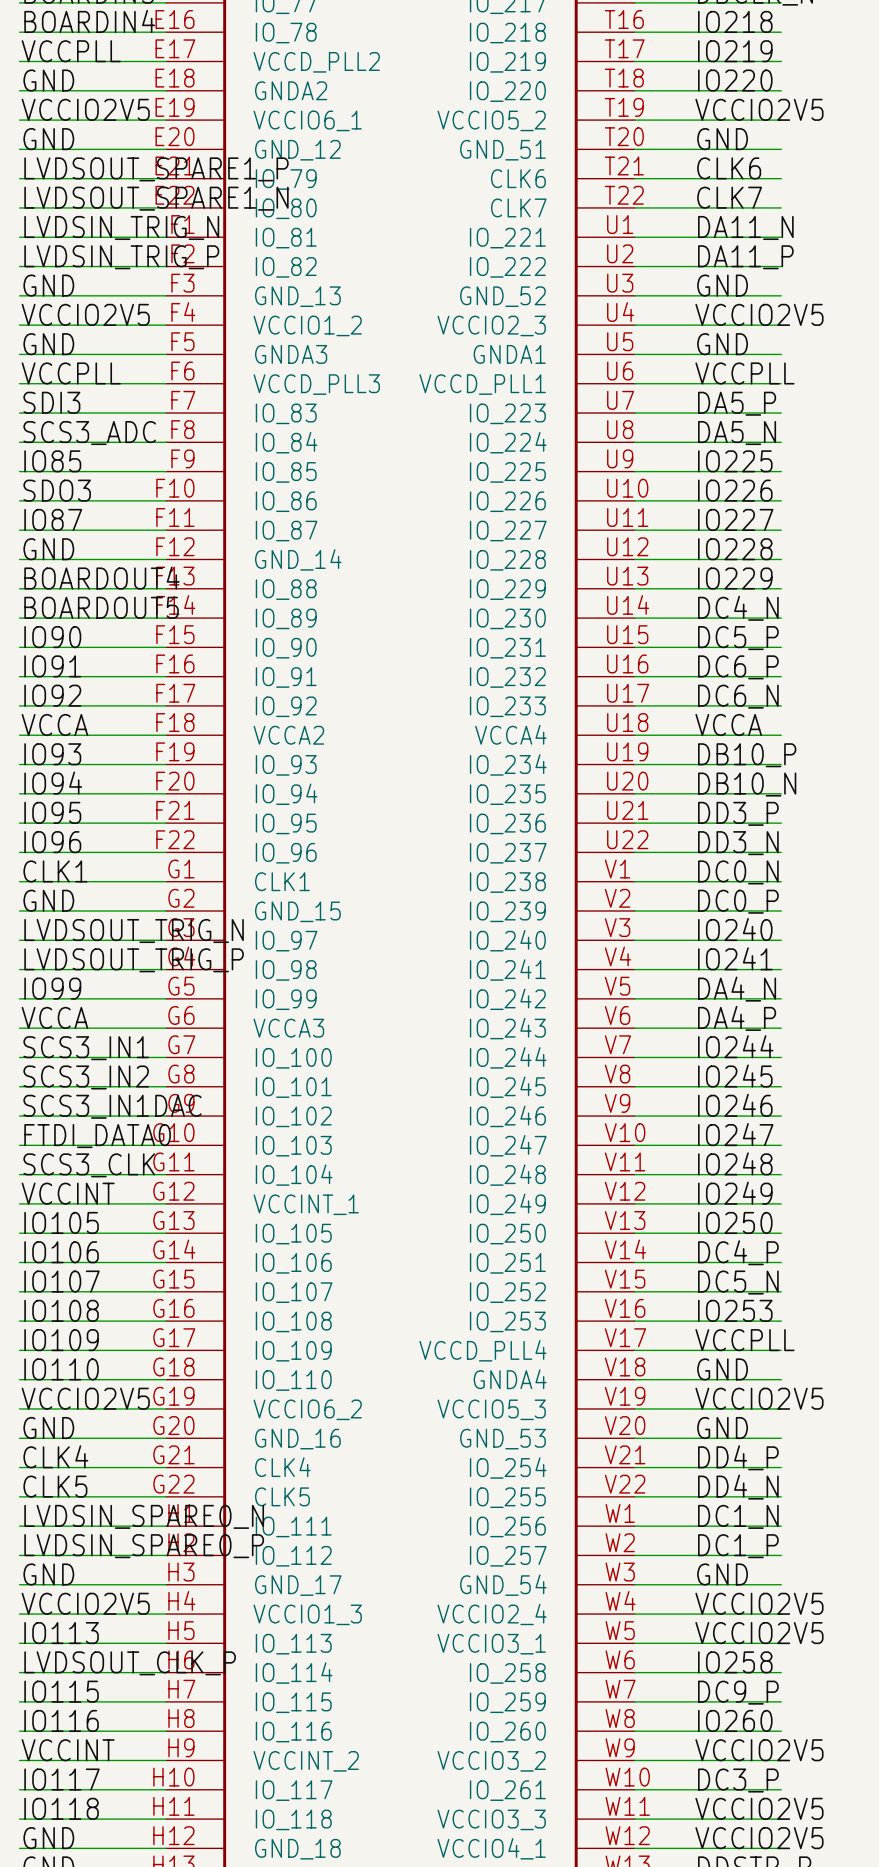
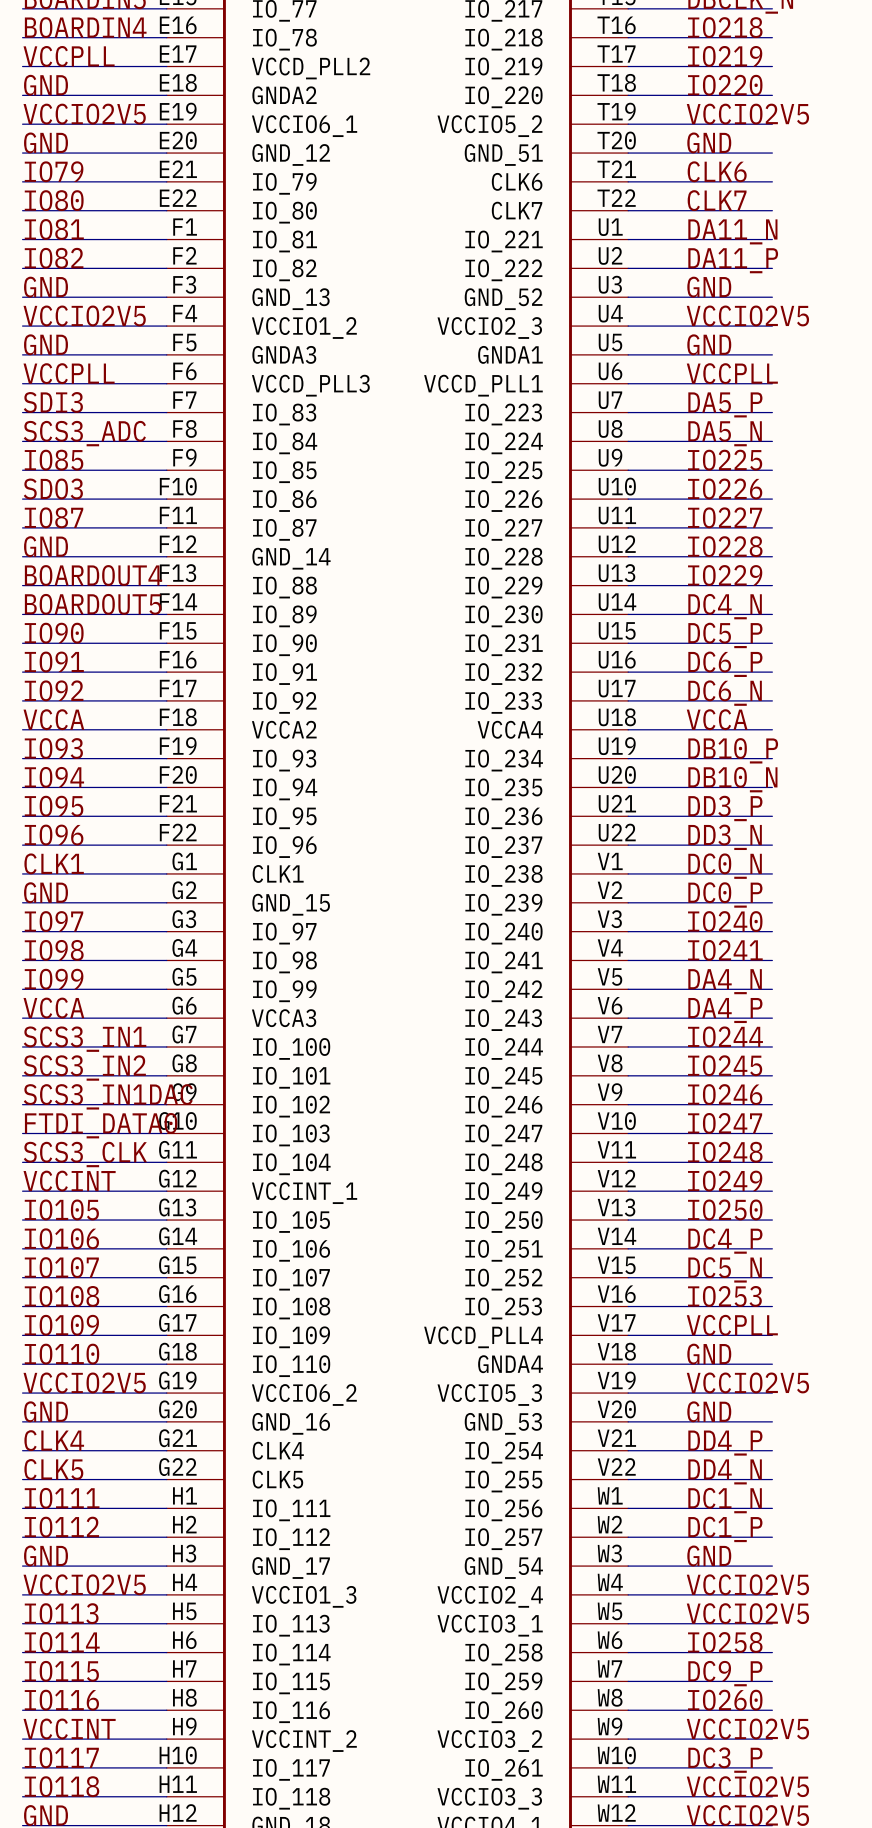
label: LVDSOUT_SPARE1_P (156, 169) -> IO79 (54, 171)
label: LVDSOUT_SPARE1_N (156, 198) -> IO80 (54, 200)
label: LVDSIN_TRIG_N (121, 227) -> IO81 (54, 229)
label: LVDSIN_TRIG_P (121, 257) -> IO82 (54, 258)
label: LVDSOUT_TRIG_N (134, 931) -> IO97 (54, 921)
label: LVDSOUT_TRIG_P (134, 960) -> IO98 (54, 950)
label: LVDSIN_SPARE0_N (144, 1516) -> IO111 (62, 1498)
label: LVDSIN_SPARE0_P (144, 1546) -> IO112 (61, 1527)
label: LVDSOUT_CLK_P (130, 1663) -> IO114 (62, 1642)

